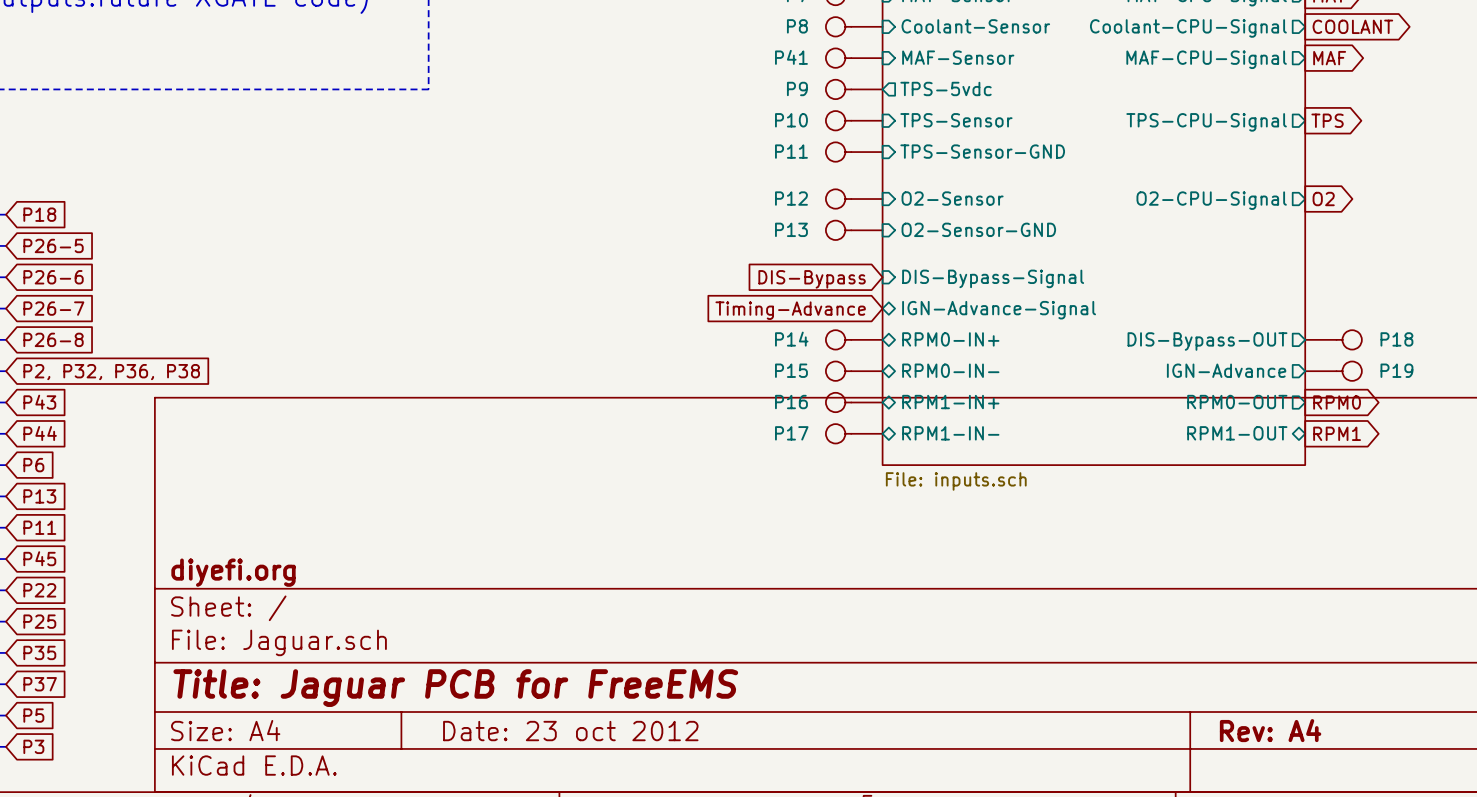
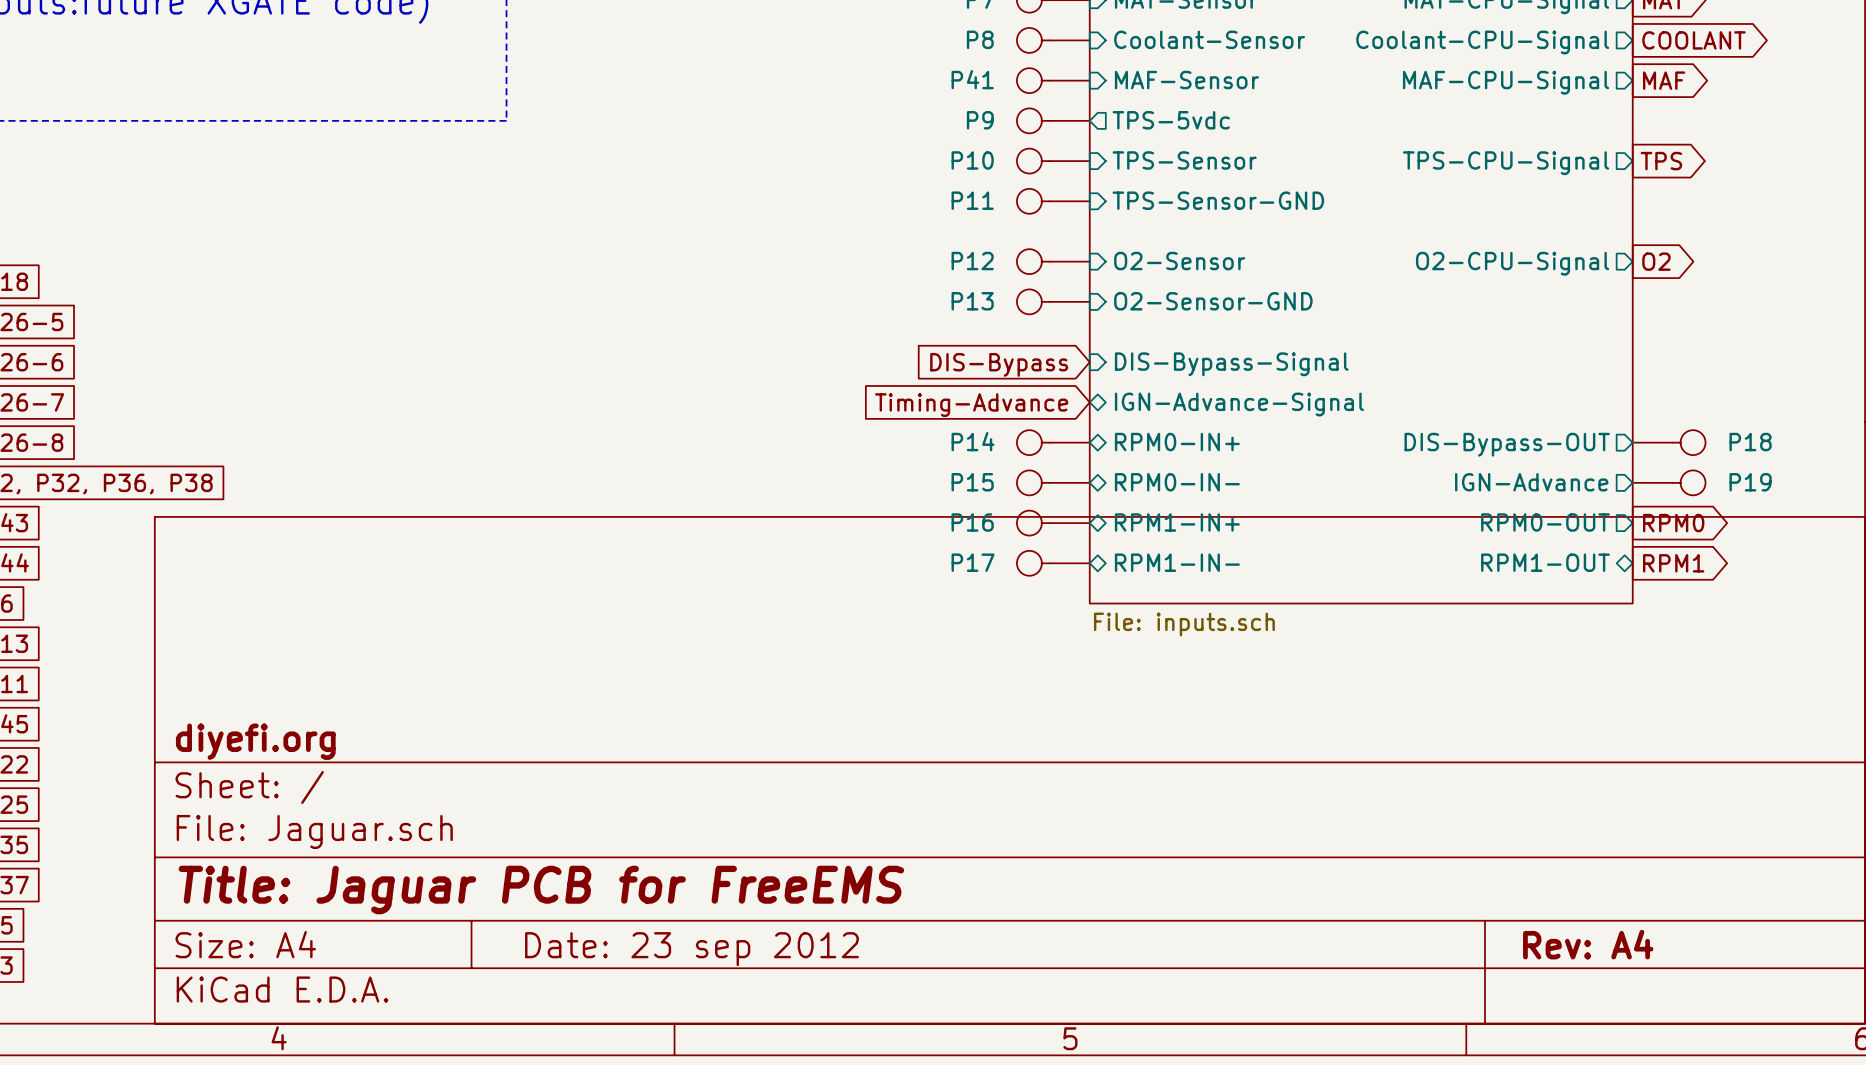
title block: Date: 23 oct 2012 (570, 731) -> Date: 23 sep 2012 (691, 949)

